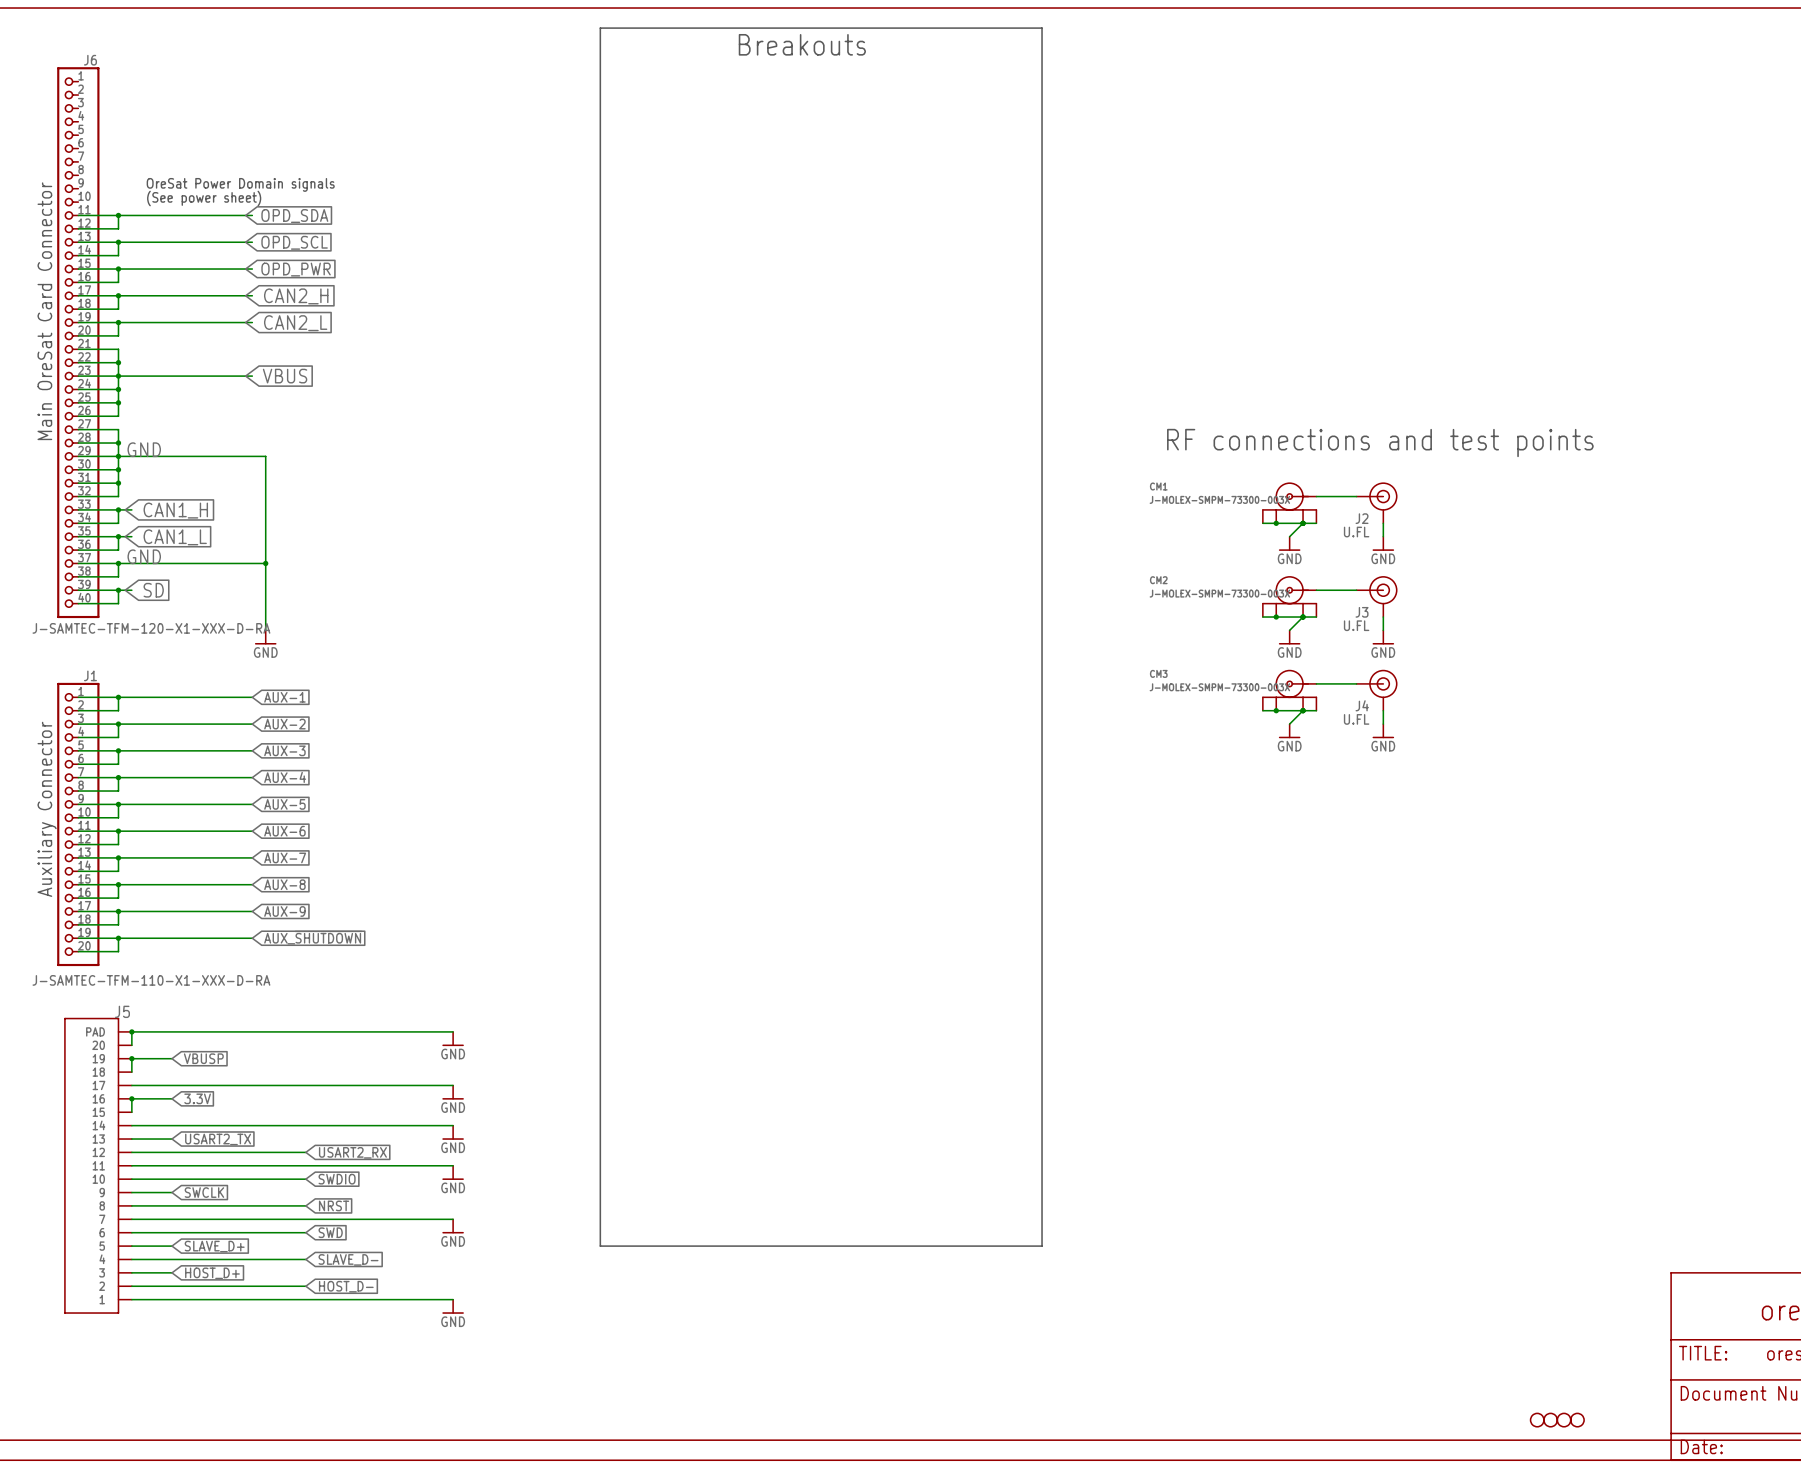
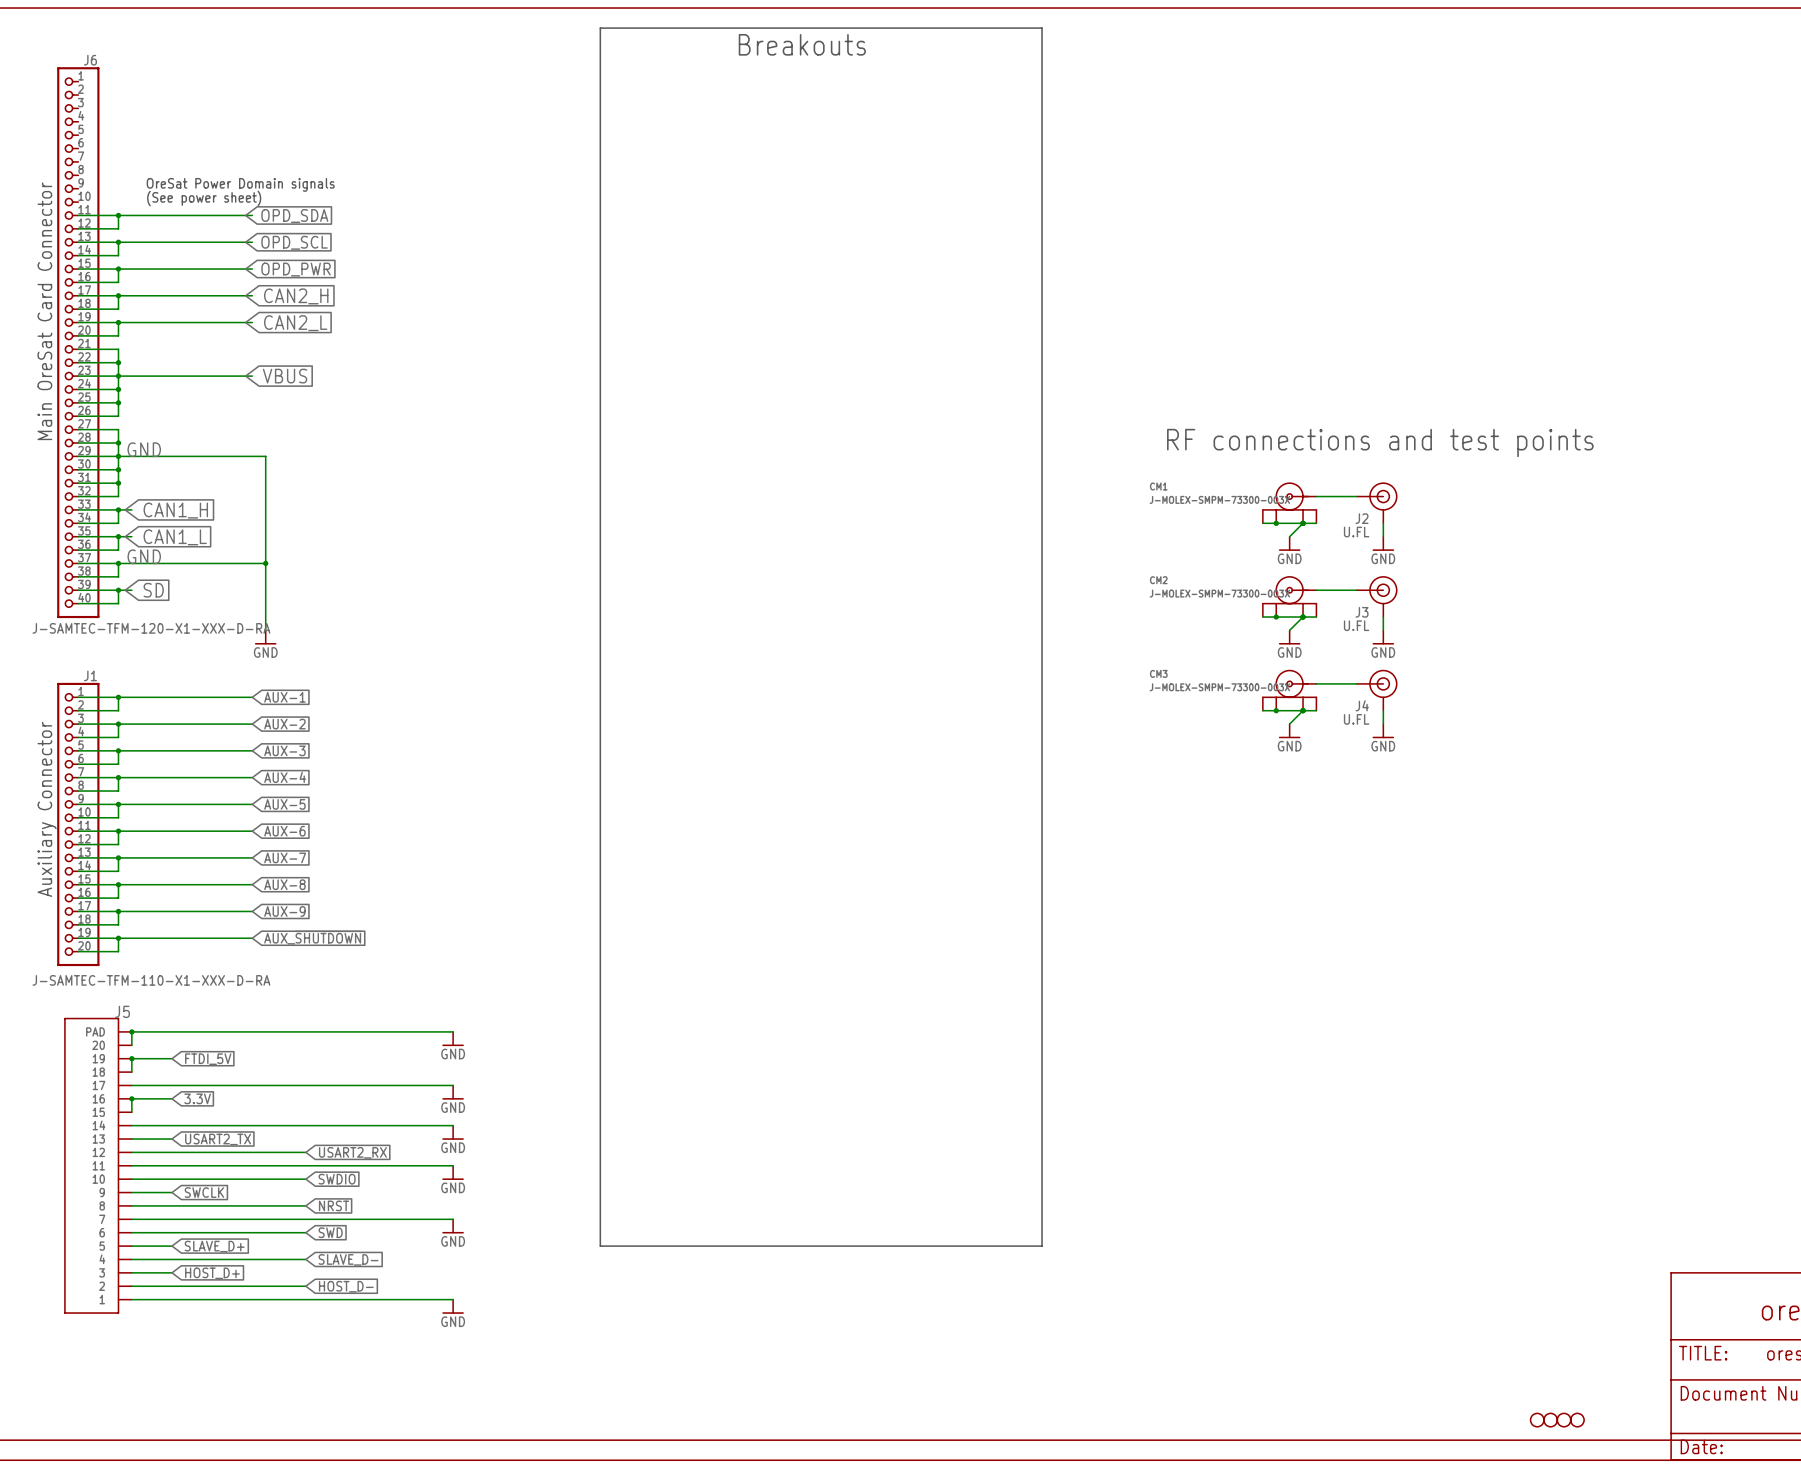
global label: VBUSP (203, 1058) -> FTDI_5V (208, 1059)

